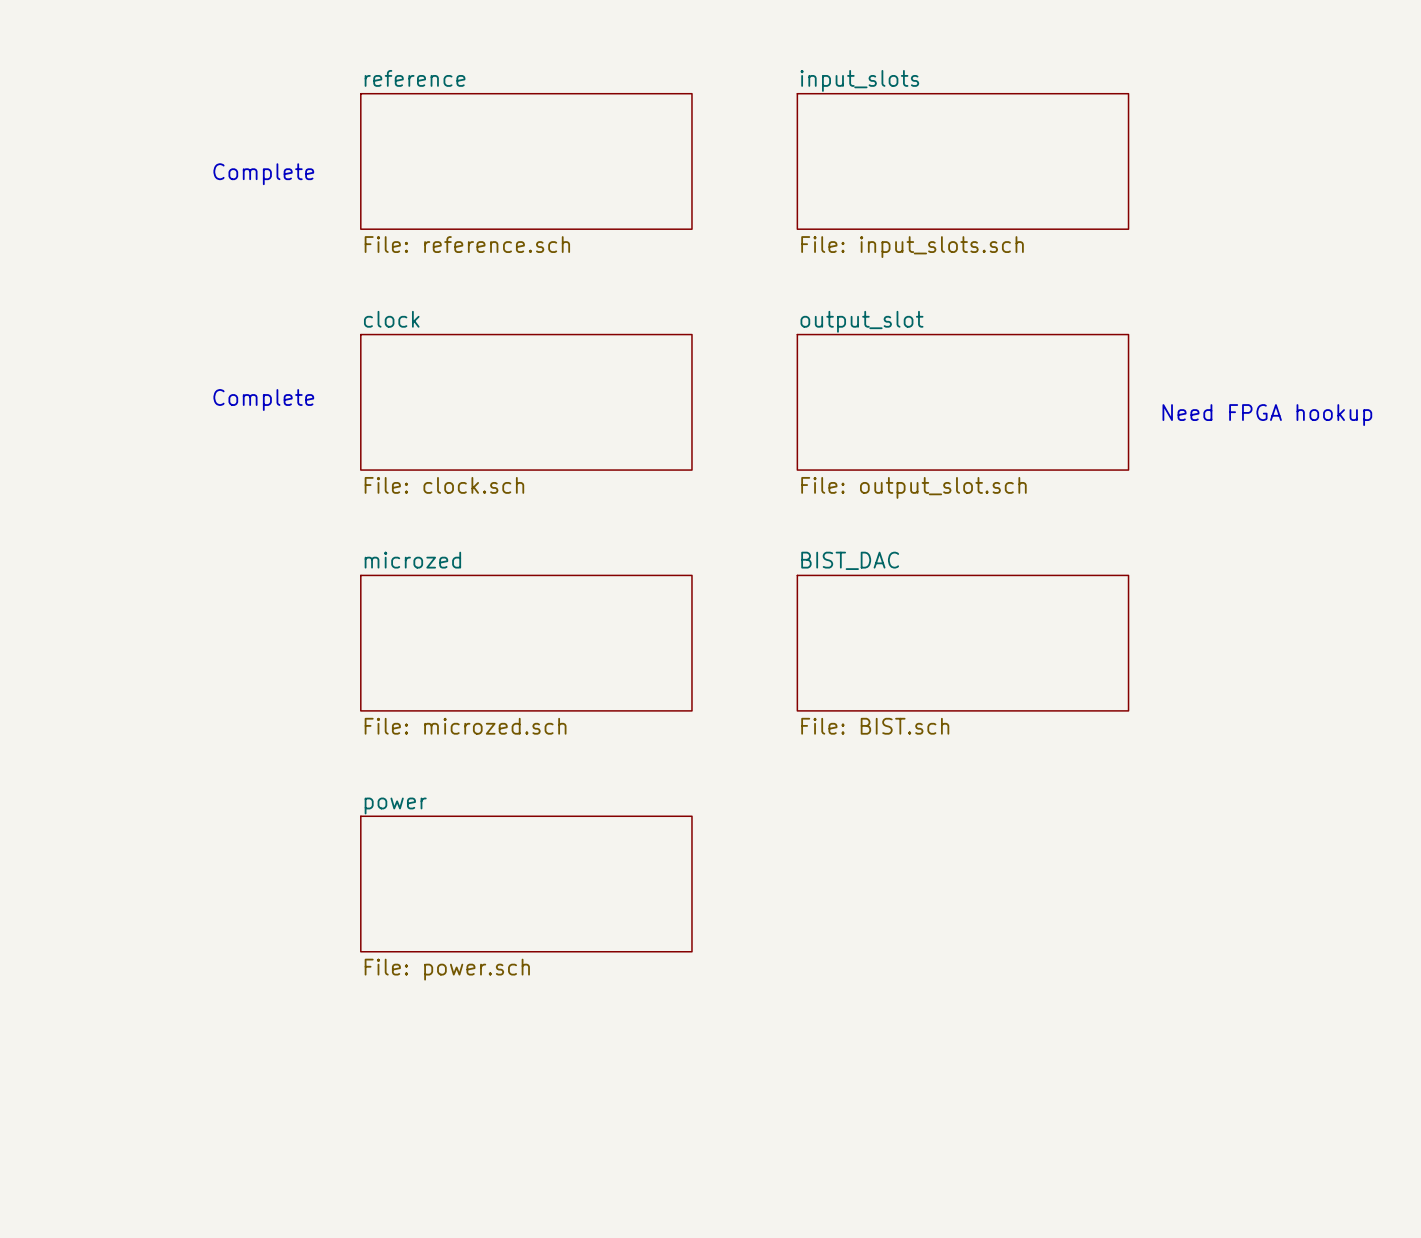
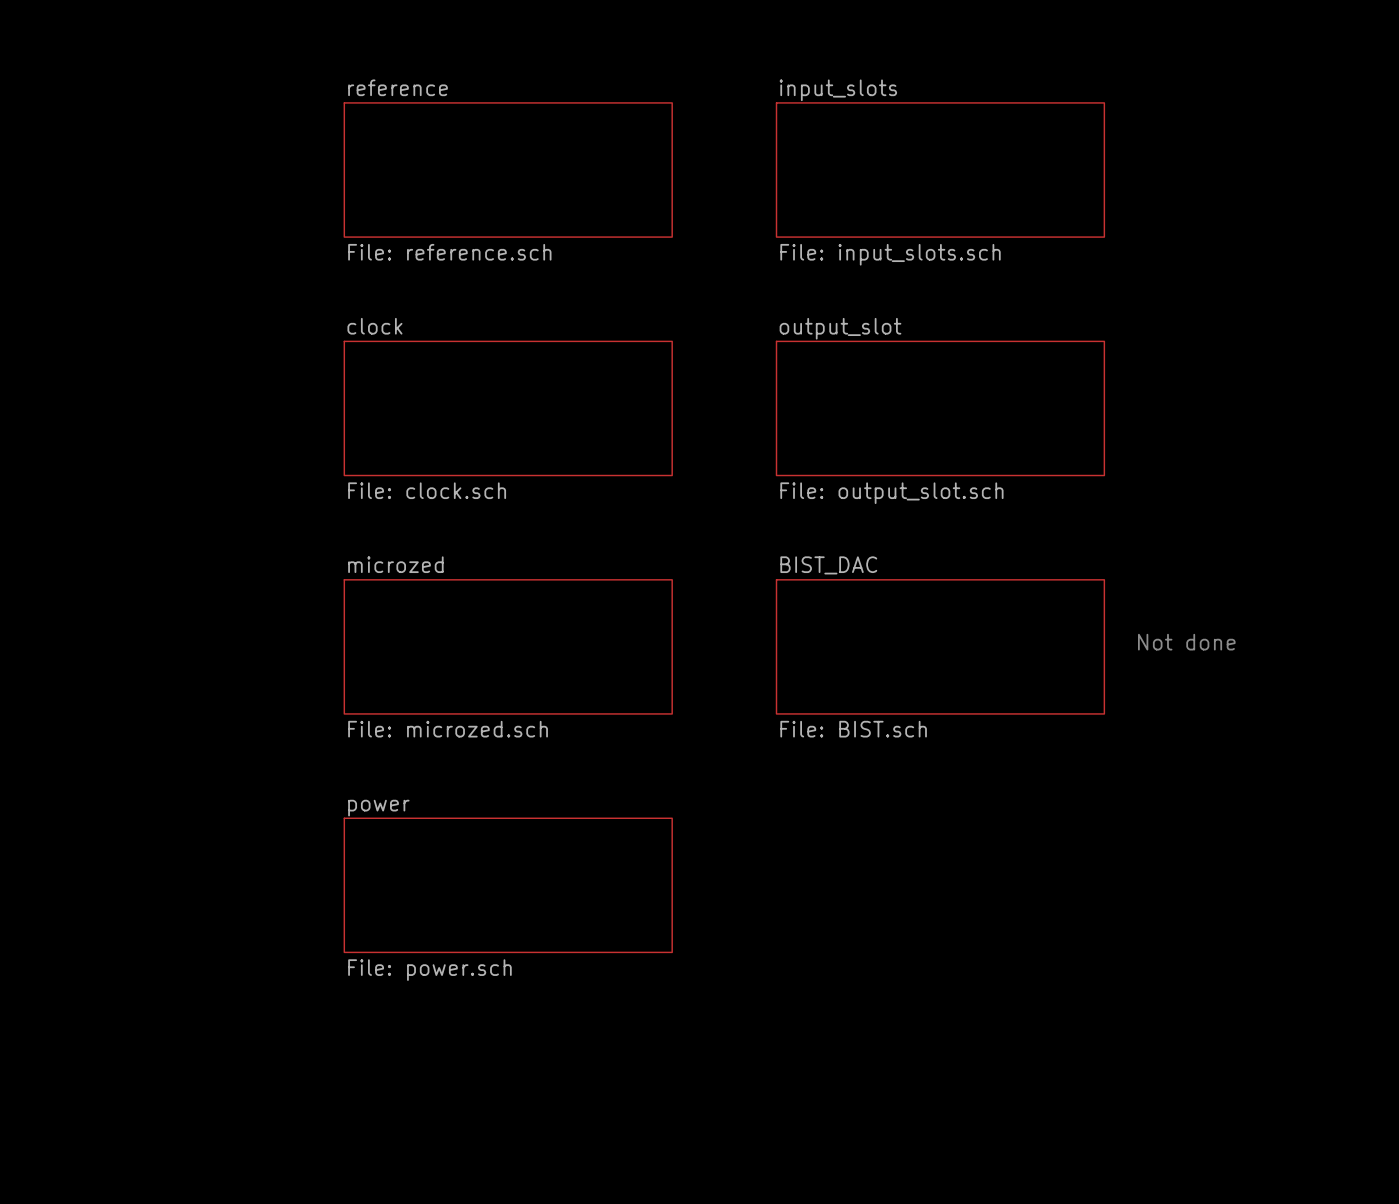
text: Complete (263, 174) -> none
text: Complete (263, 400) -> none
text: Need FPGA hookup (1267, 415) -> none
text: none -> Not done (1186, 642)

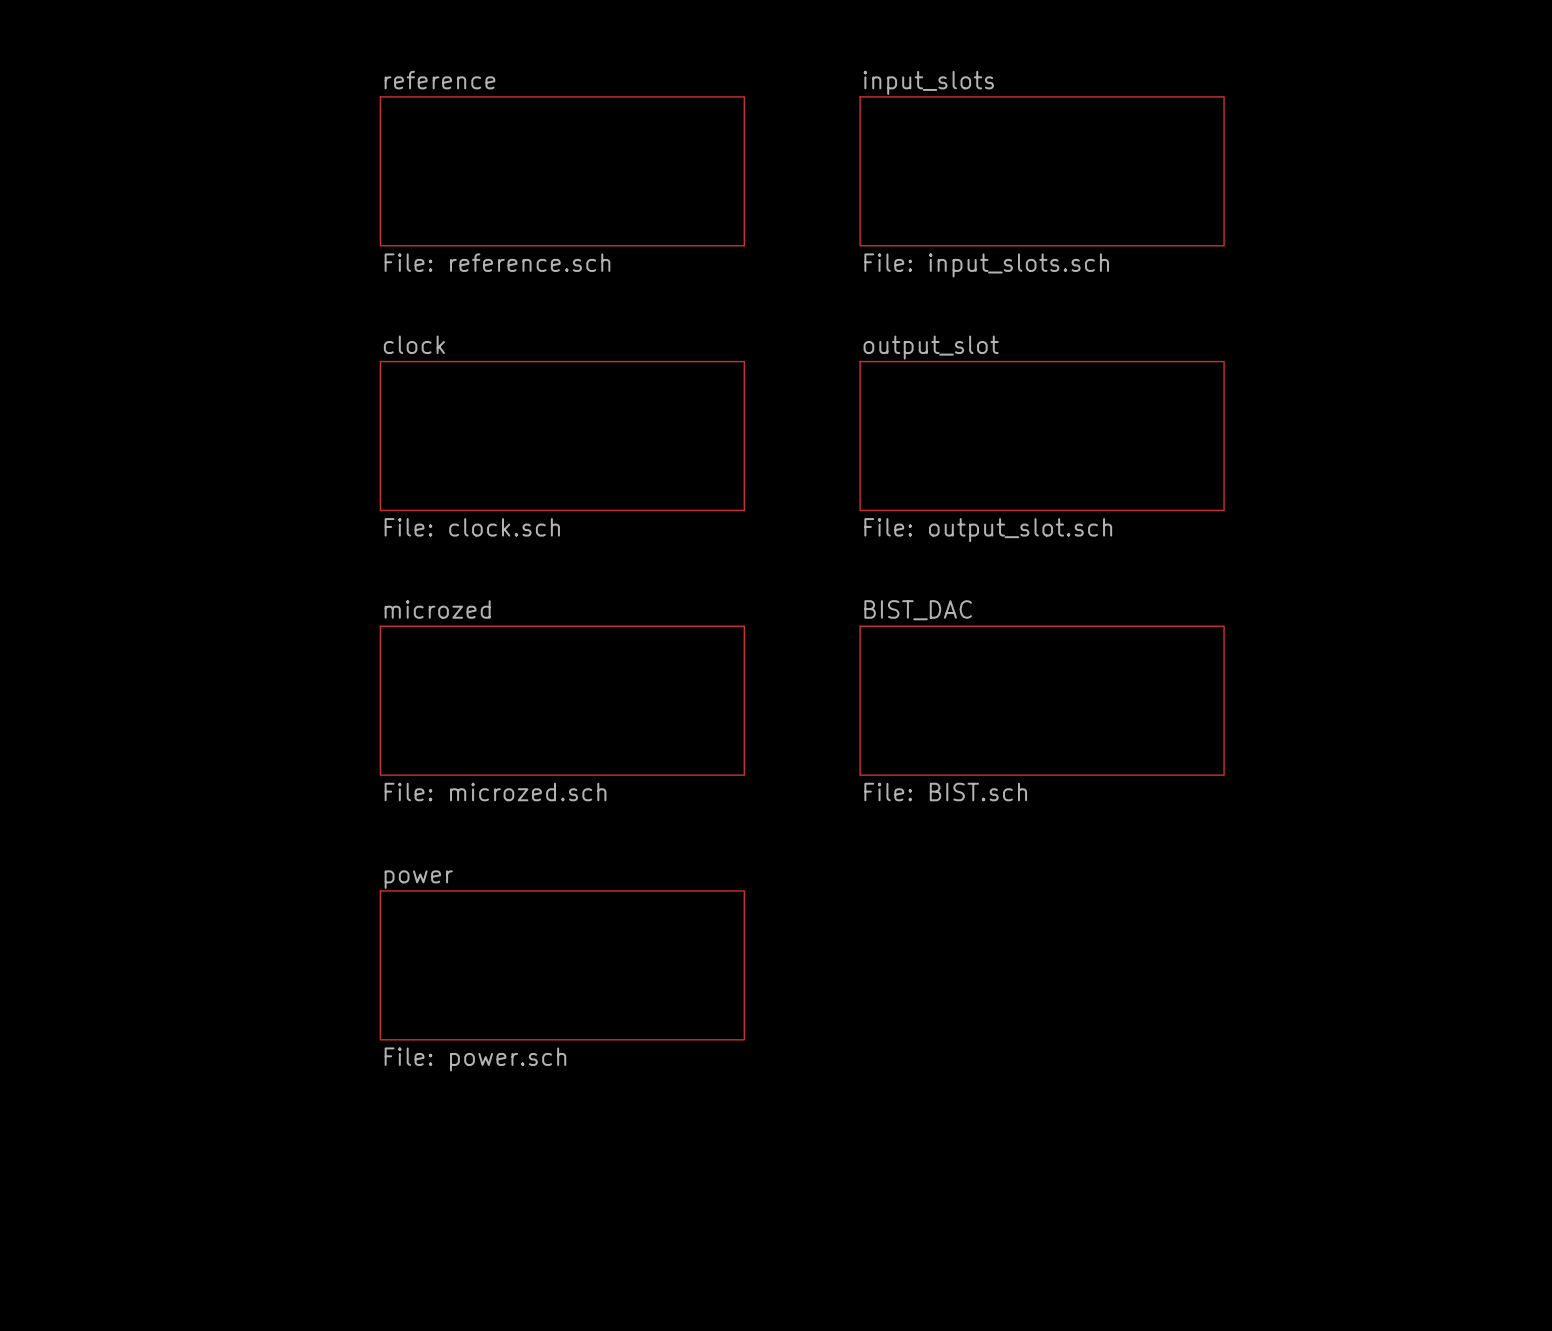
text: Not done (1186, 642) -> none

